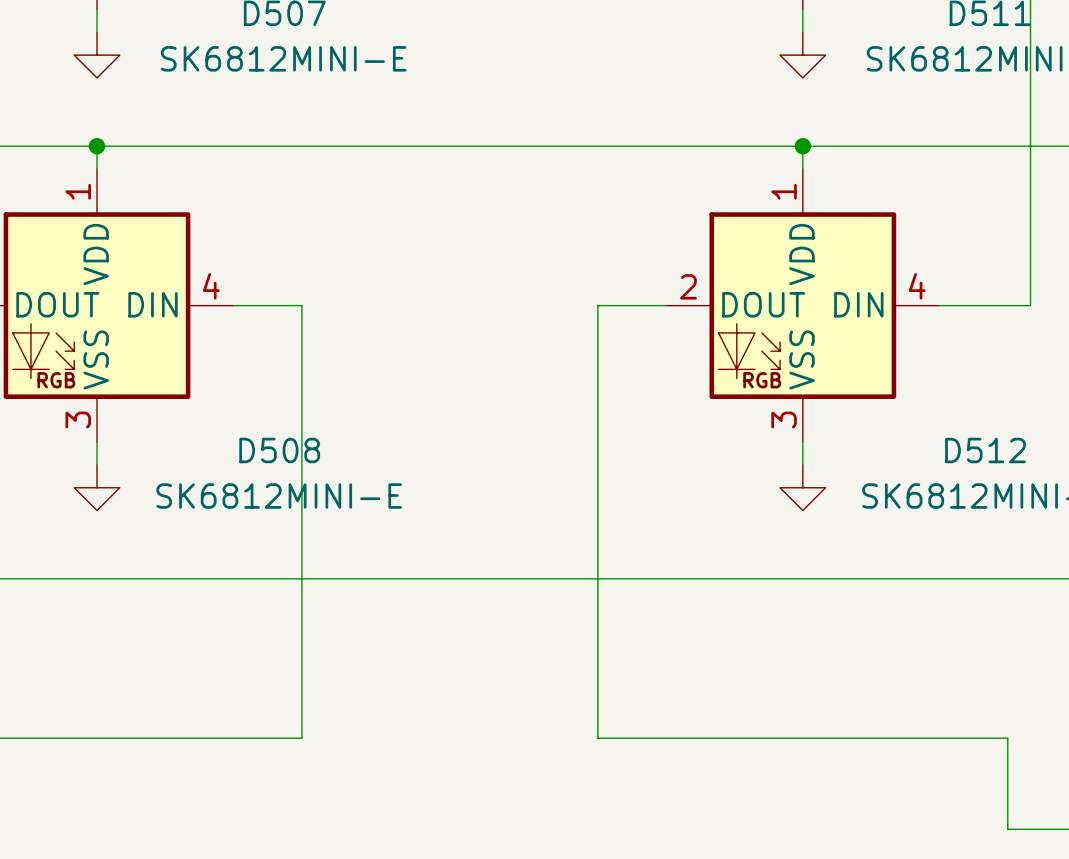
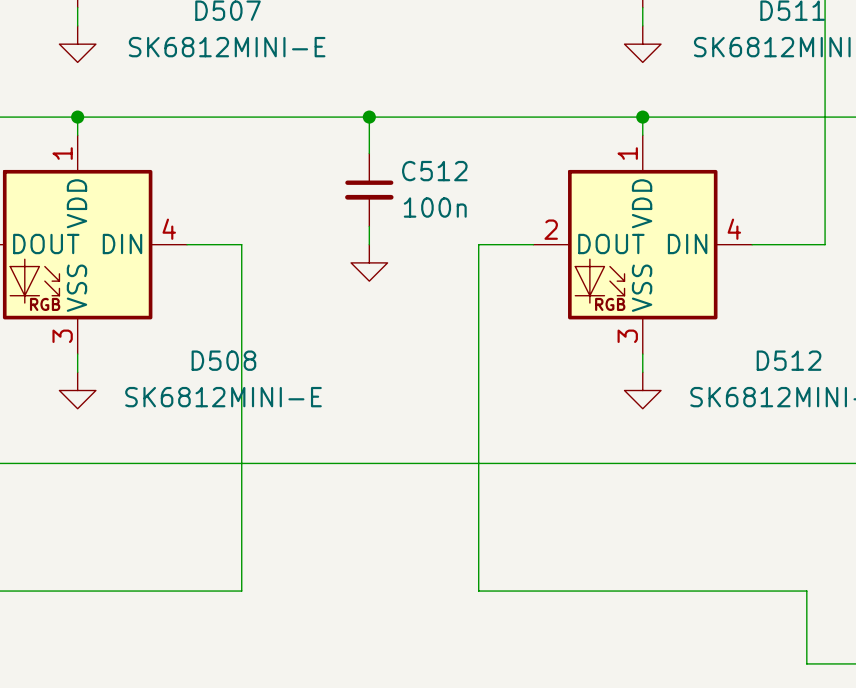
wire: none -> (369, 117) (369, 153)
junction: none -> (369, 117)
C512: none -> 100n (369, 189)
wire: none -> (369, 226) (369, 244)
power symbol: none -> (369, 262)

